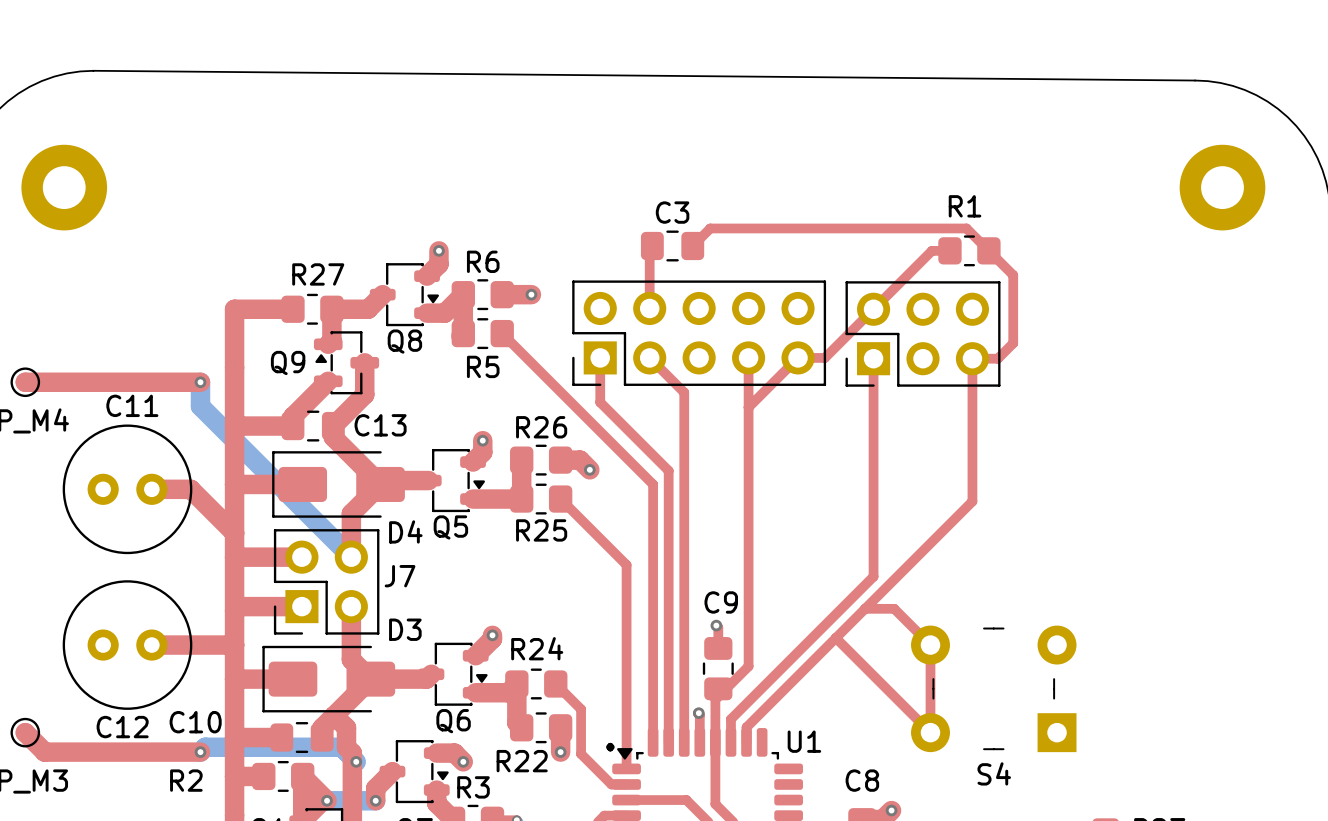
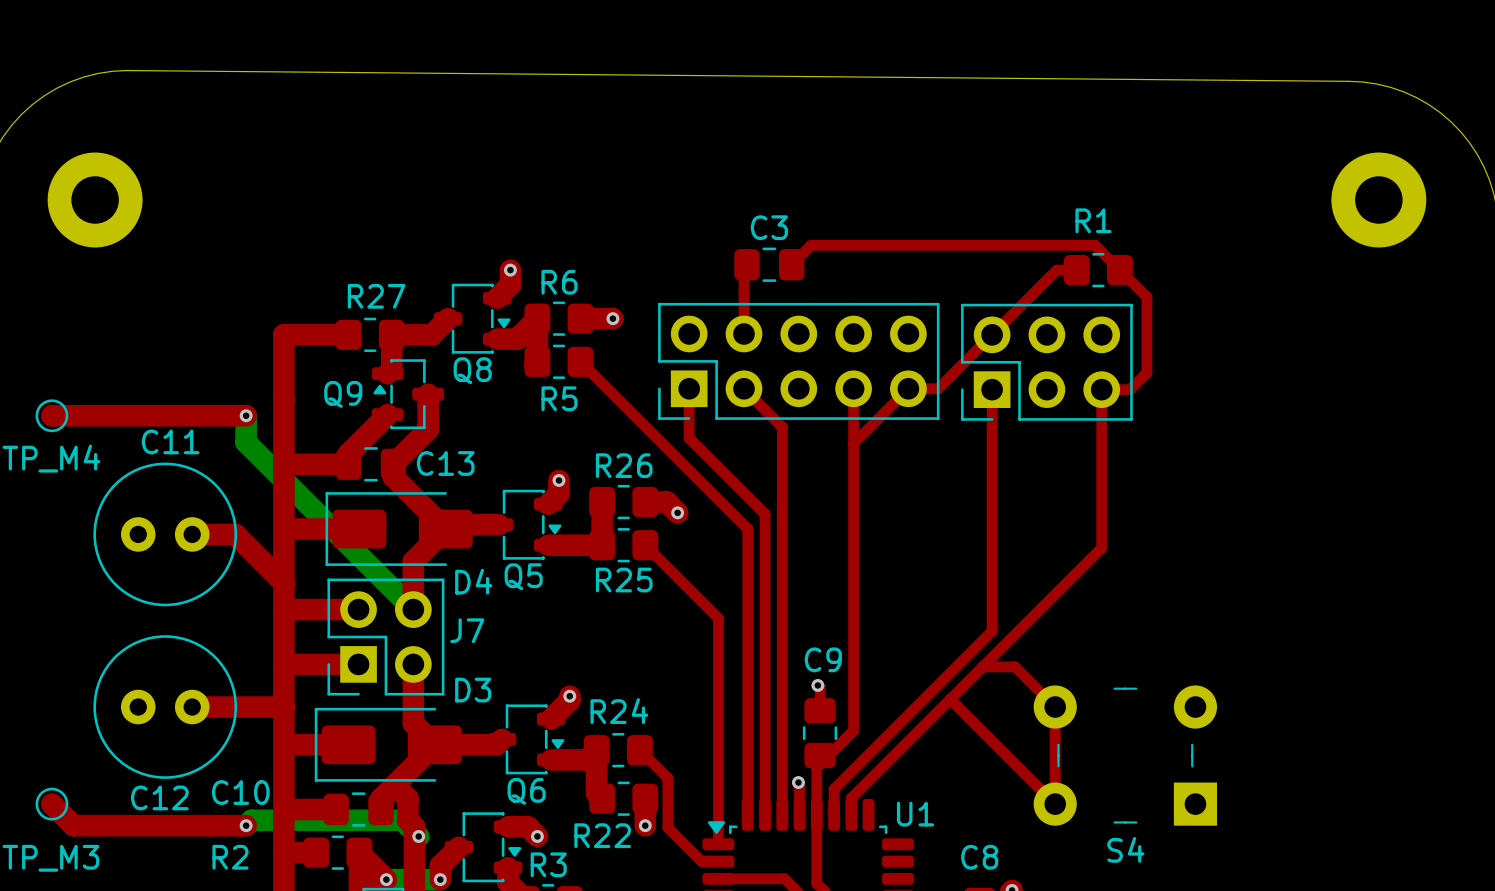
text: . (610, 747) -> none

